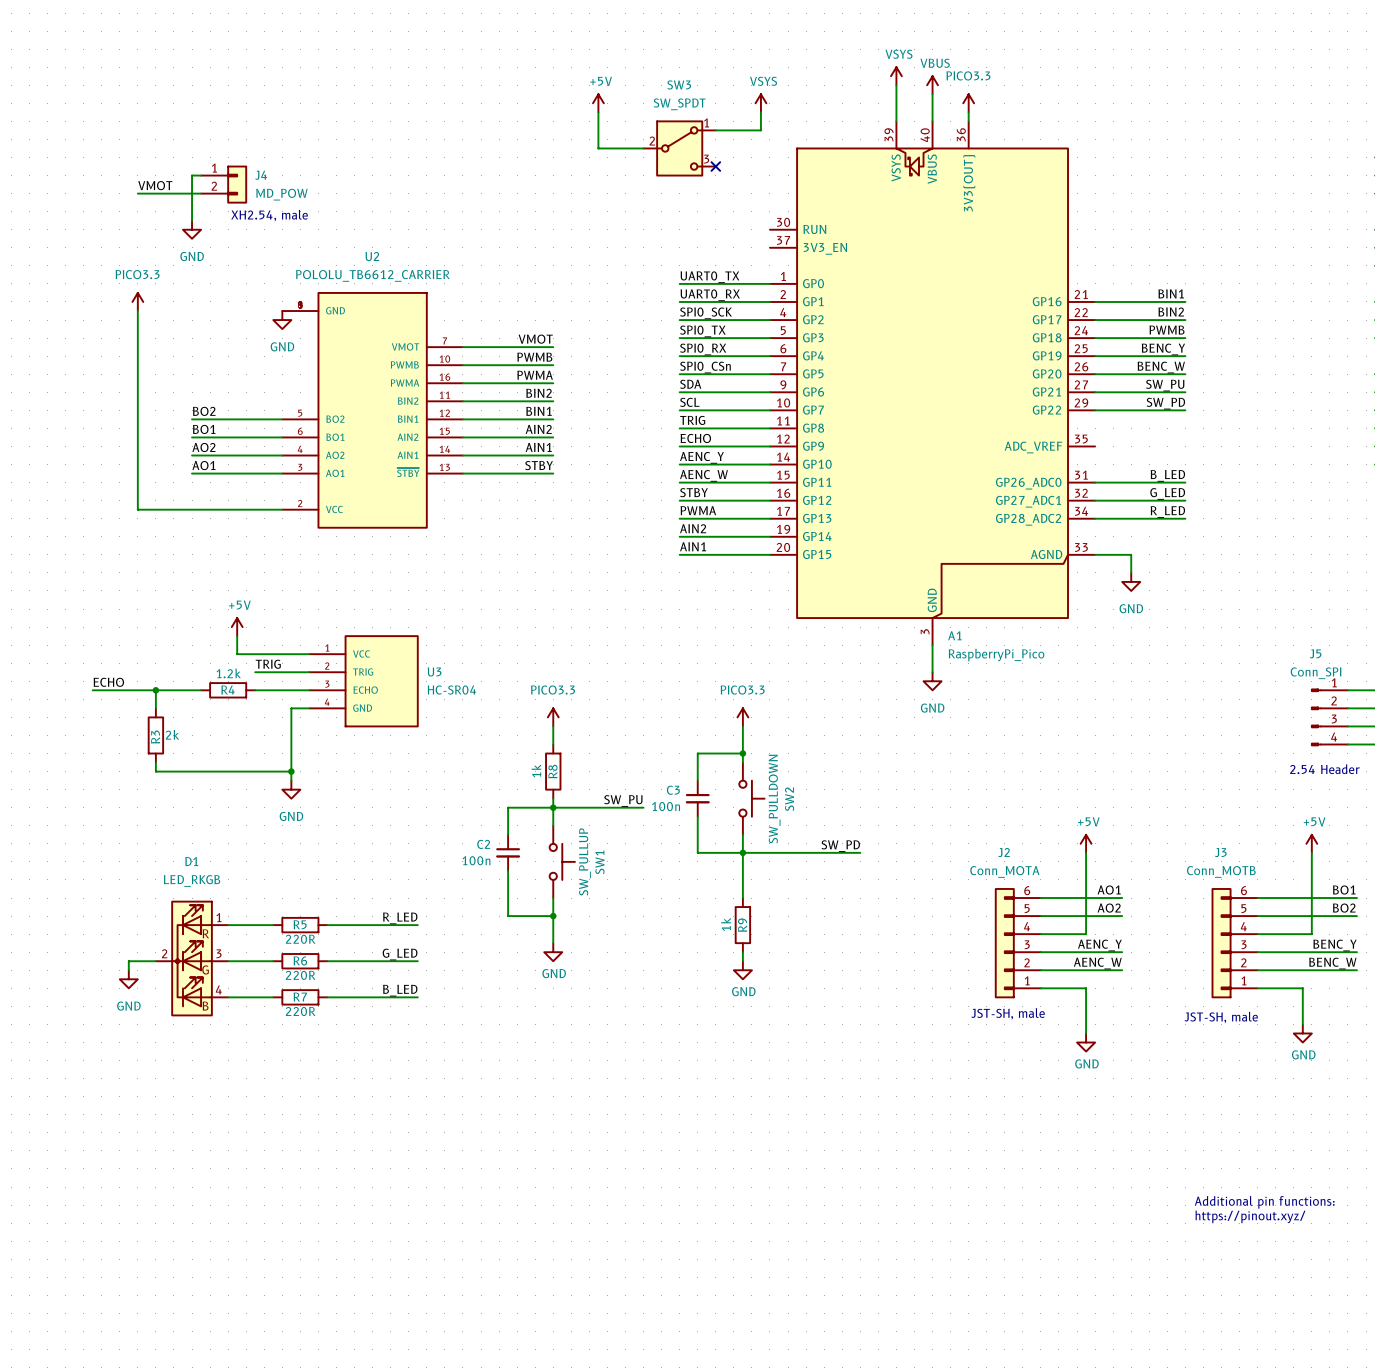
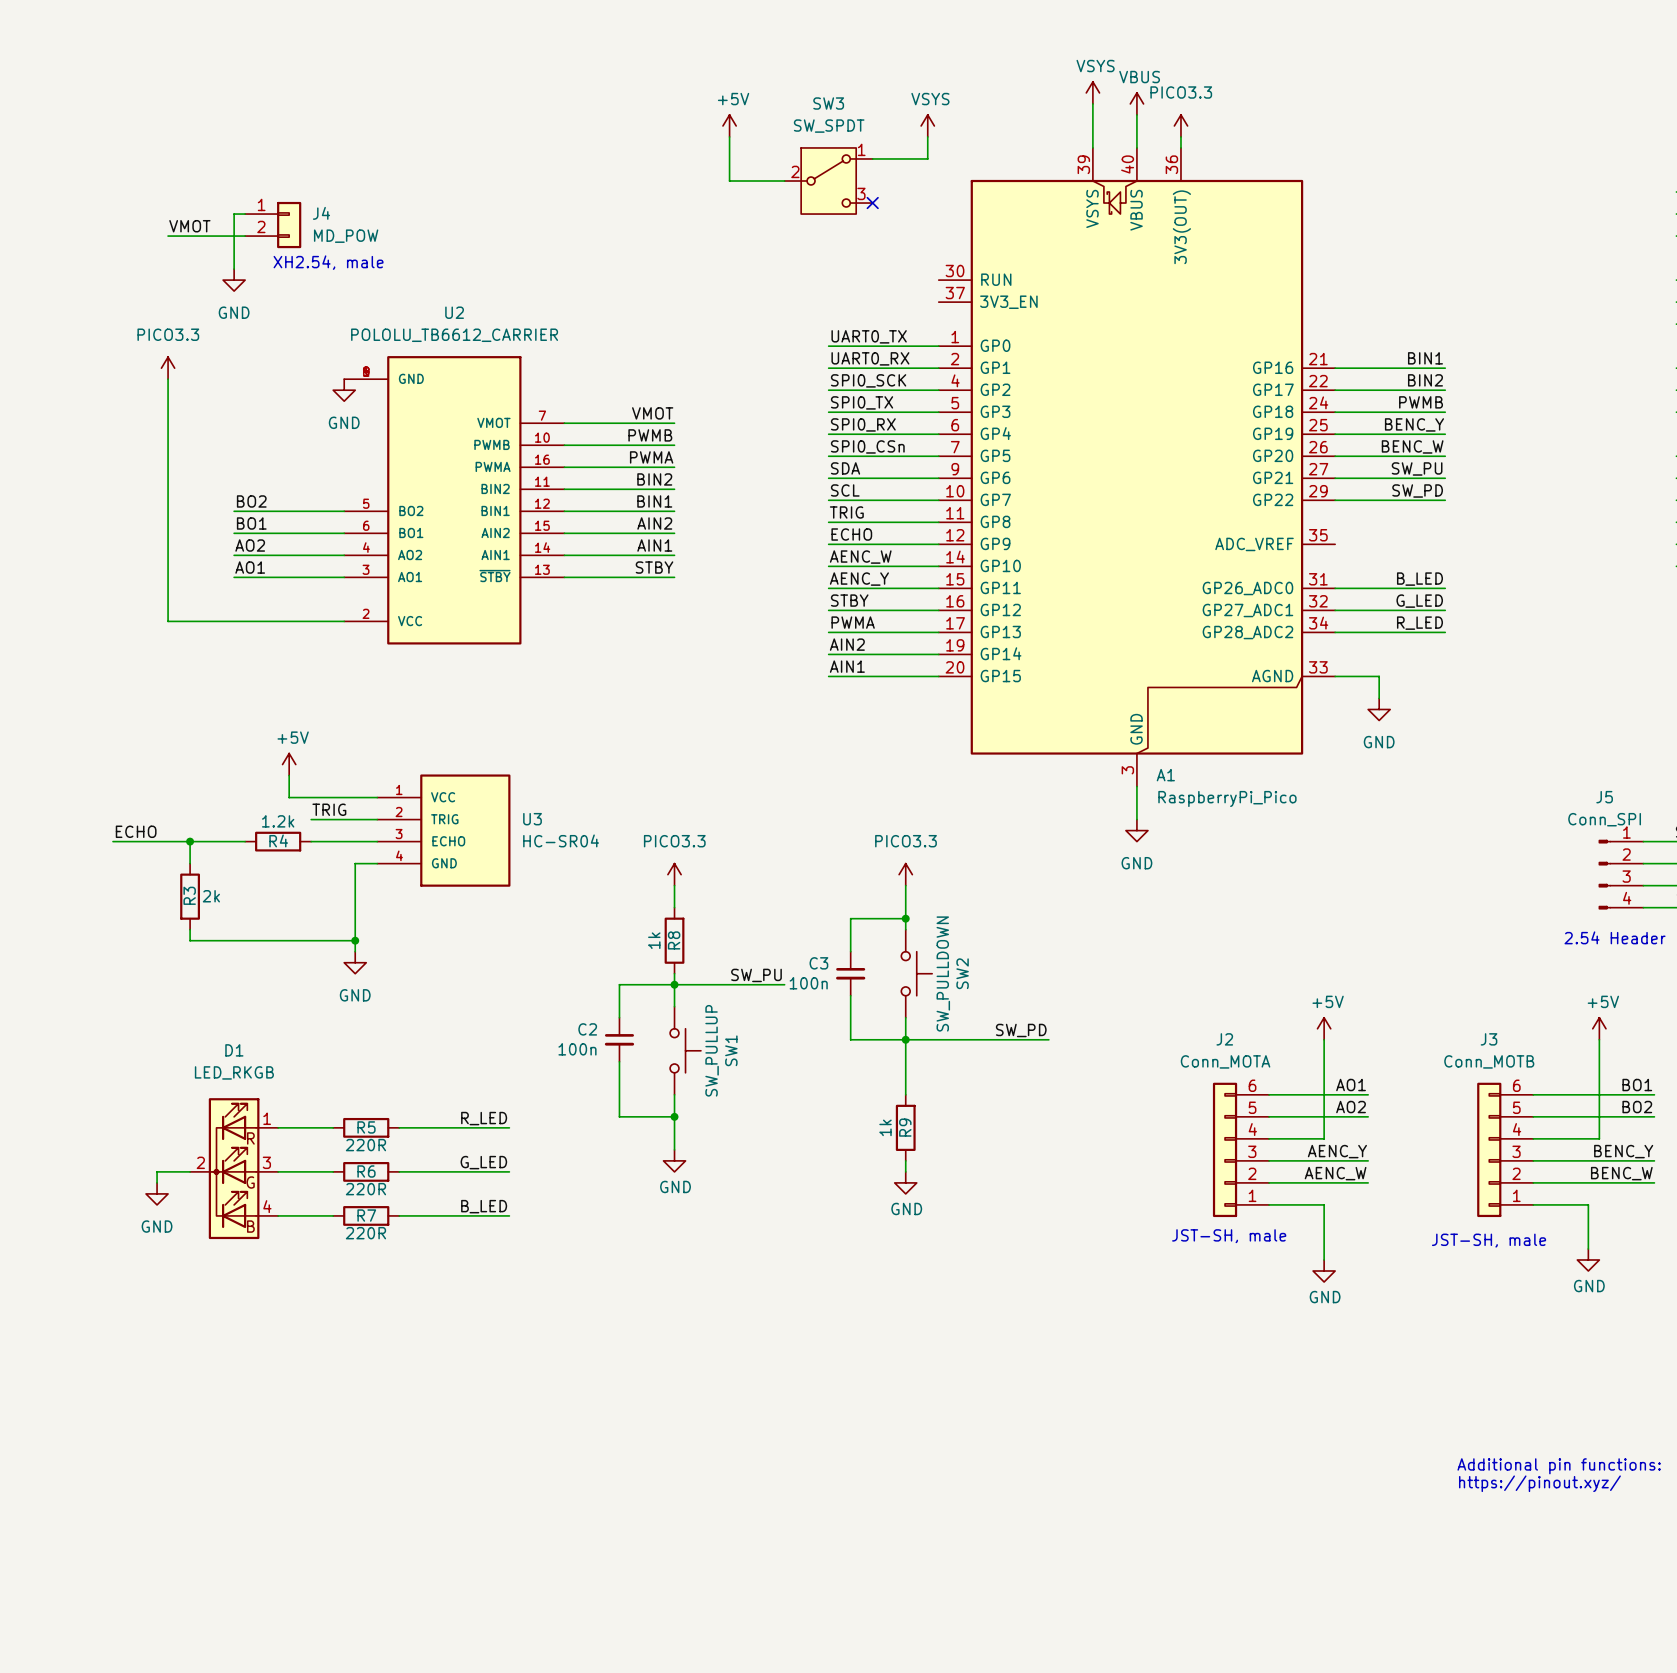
label: AENC_Y (701, 457) -> AENC_W (860, 557)
label: AENC_W (703, 475) -> AENC_Y (859, 579)

